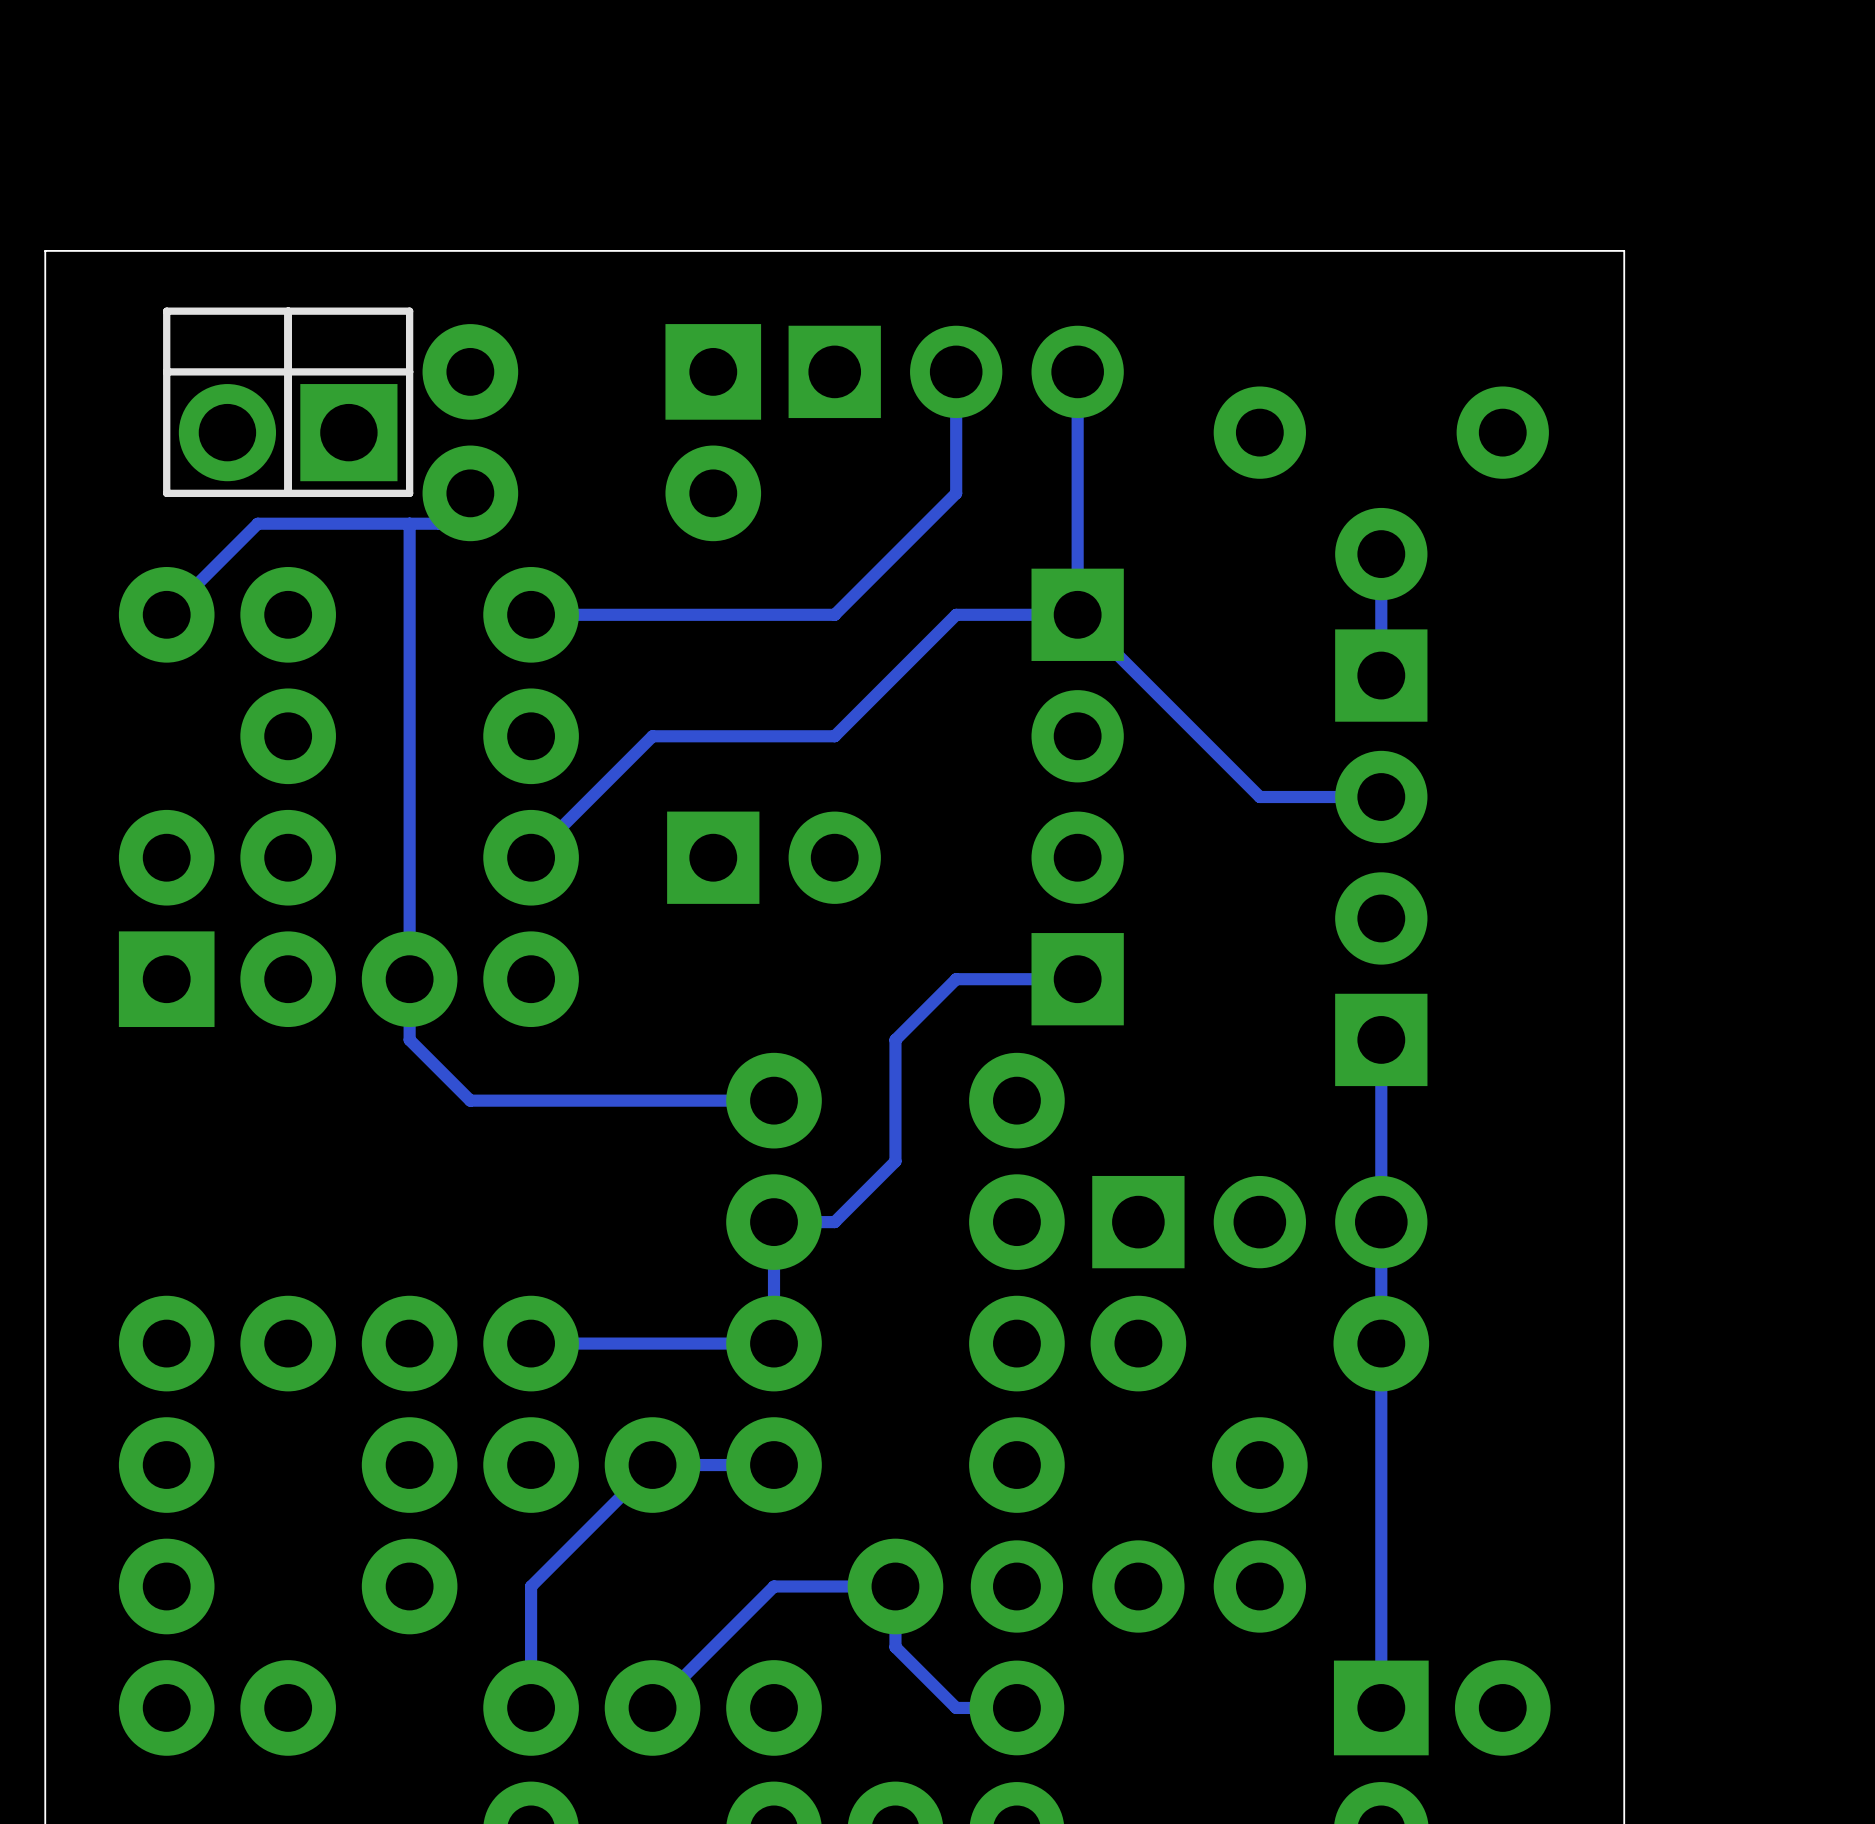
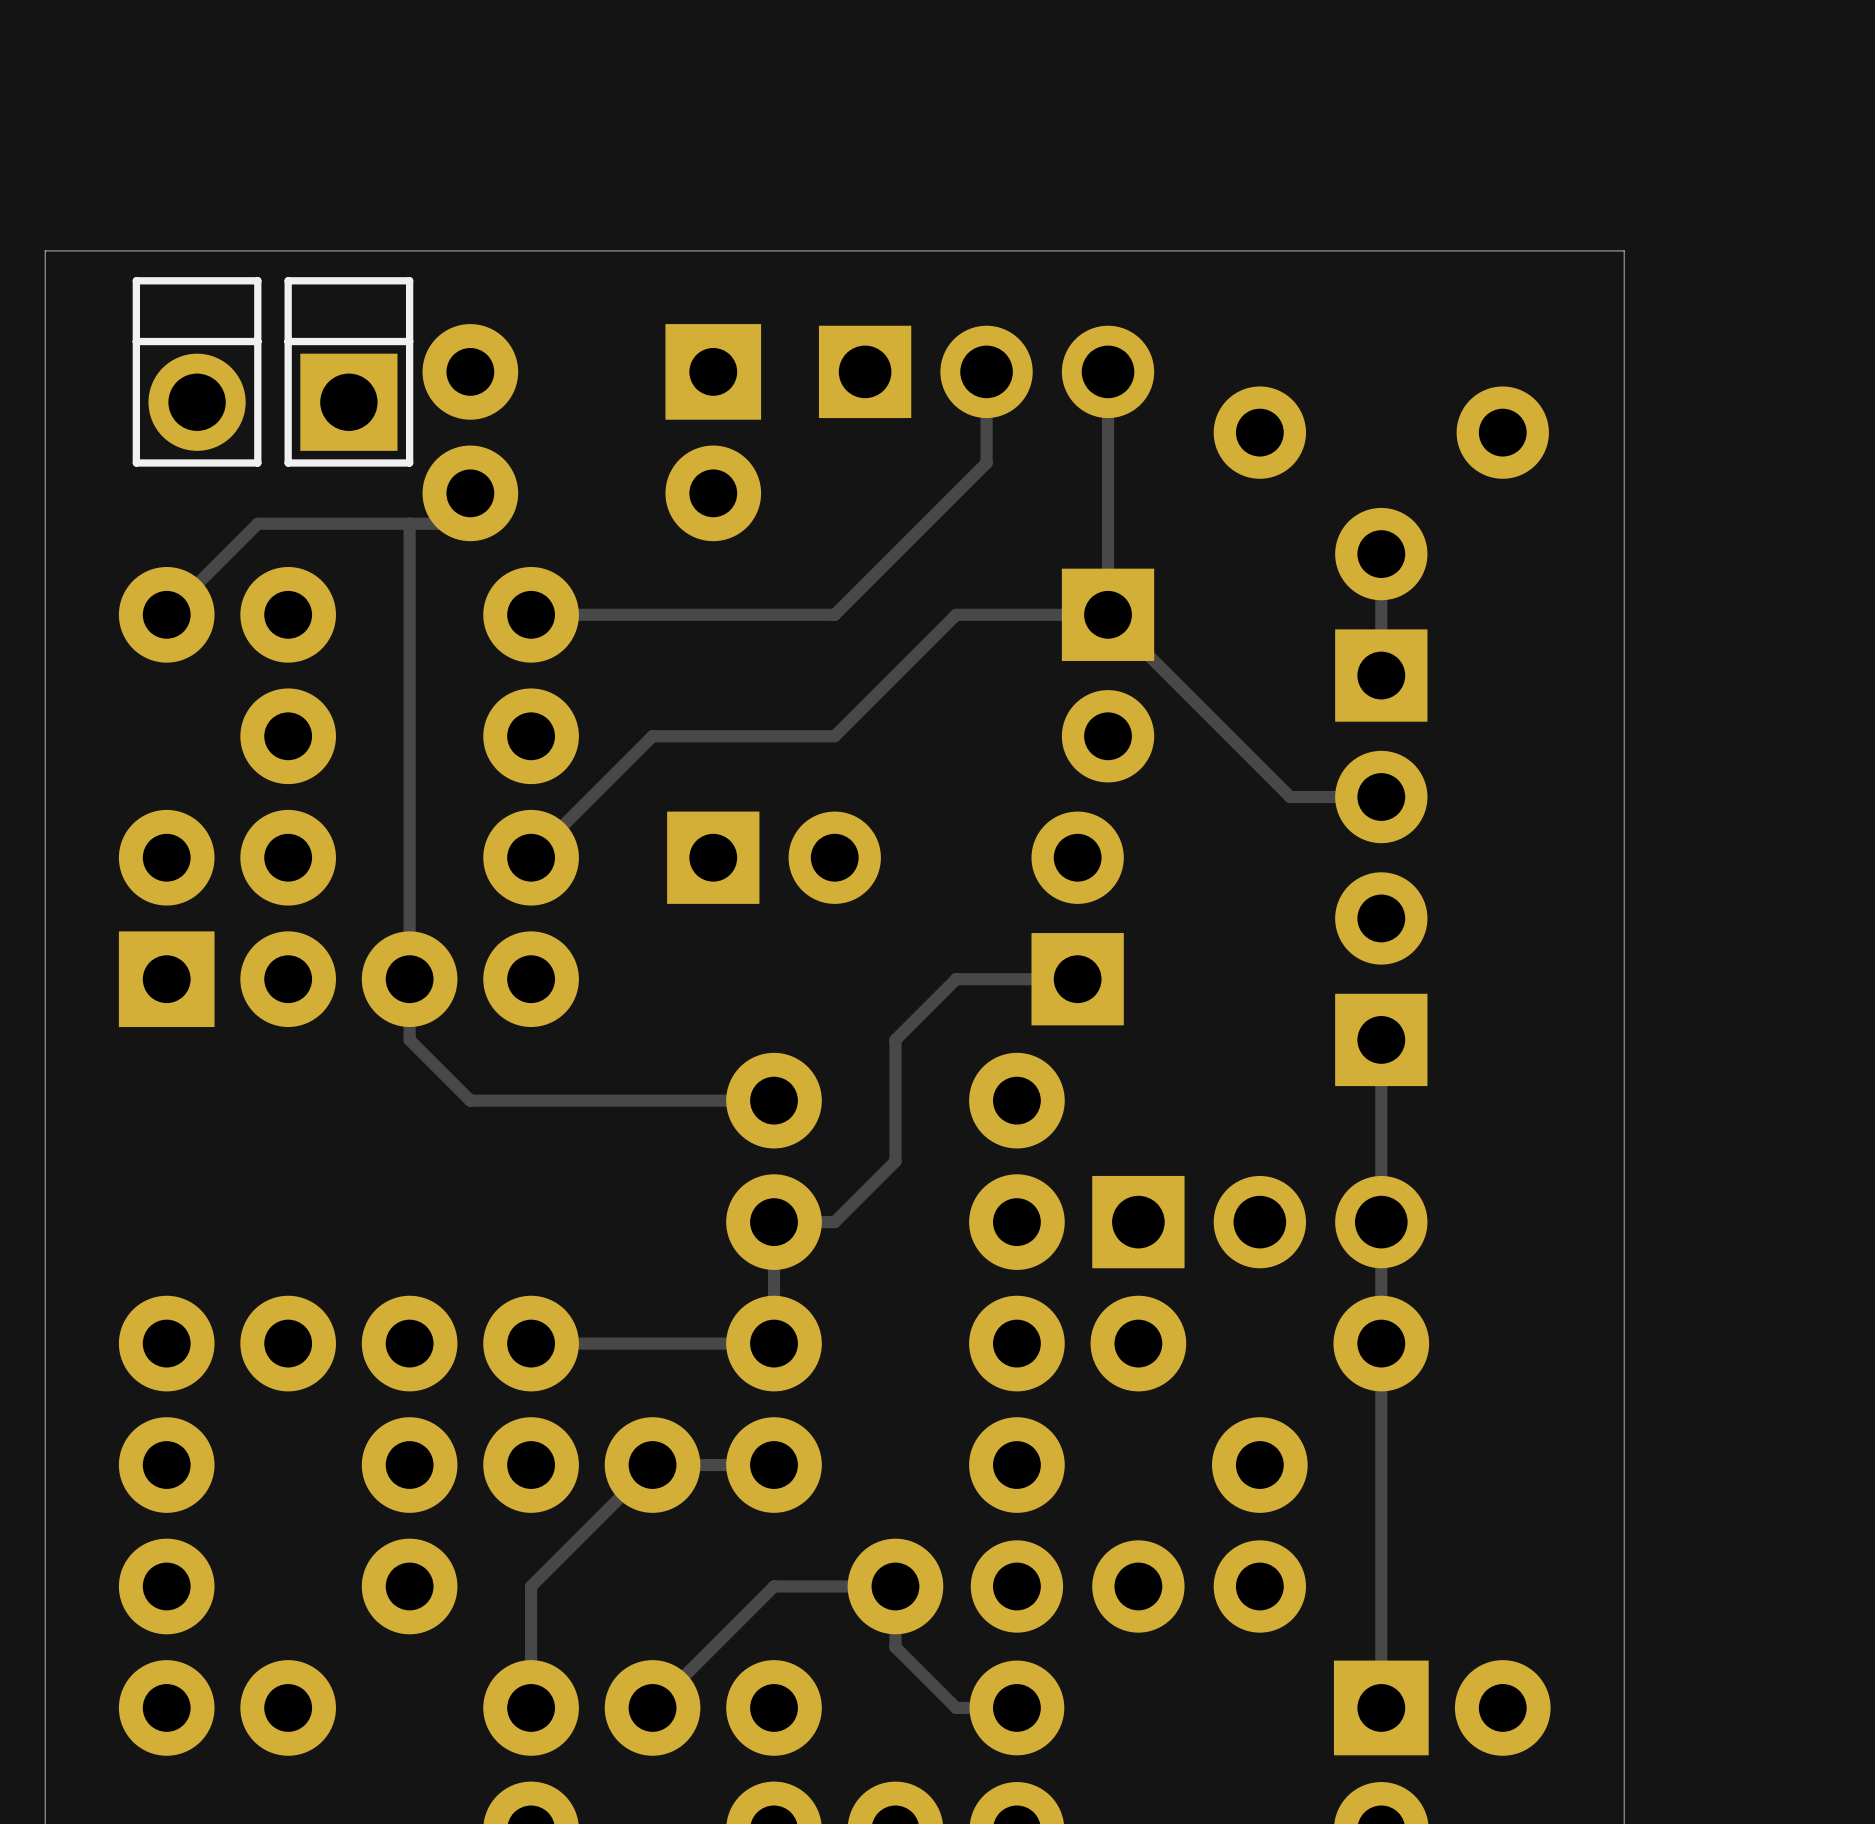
track: (956, 371) (956, 493) -> (986, 371) (986, 462) (956, 493)
part position: (956, 371) -> (986, 371)
track: (1077, 371) (1077, 614) (1259, 797) (1290, 797) -> (1108, 614) (1290, 797)
track: none -> (1108, 371) (1108, 614)
part position: (227, 402) -> (197, 371)
part position: (348, 402) -> (348, 371)
part position: (1077, 675) -> (1108, 675)

